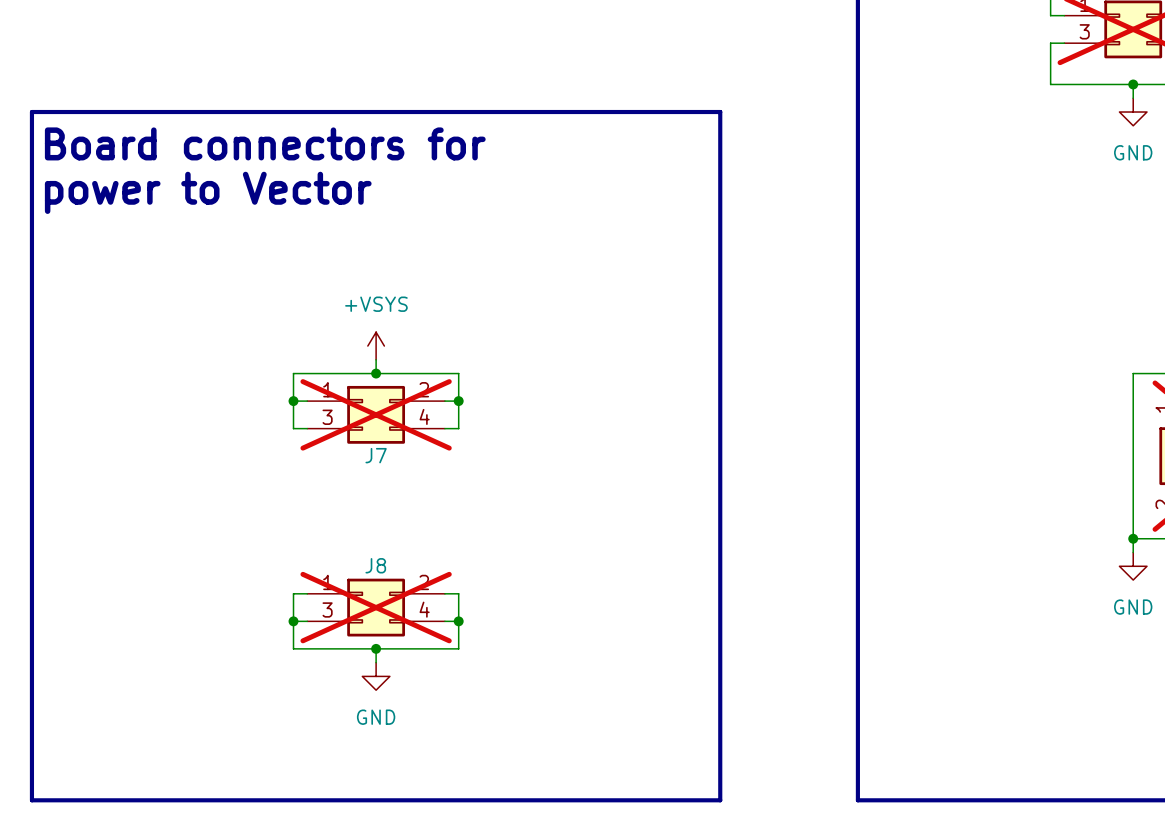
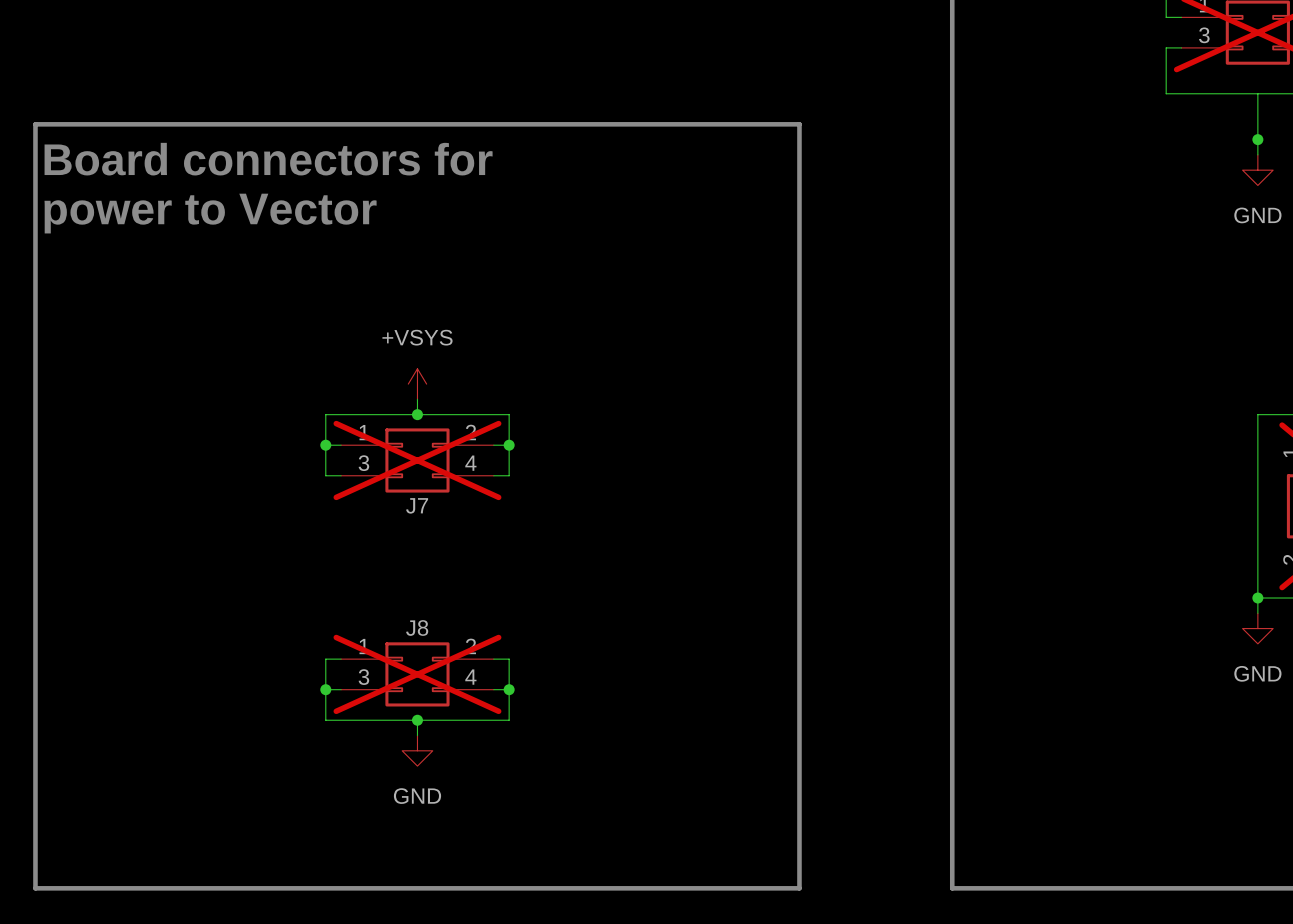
junction: (1133, 84) -> none
wire: none -> (1257, 109) (1257, 154)
power symbol position: GND (1133, 112) -> GND (1257, 170)
junction: none -> (1257, 139)

